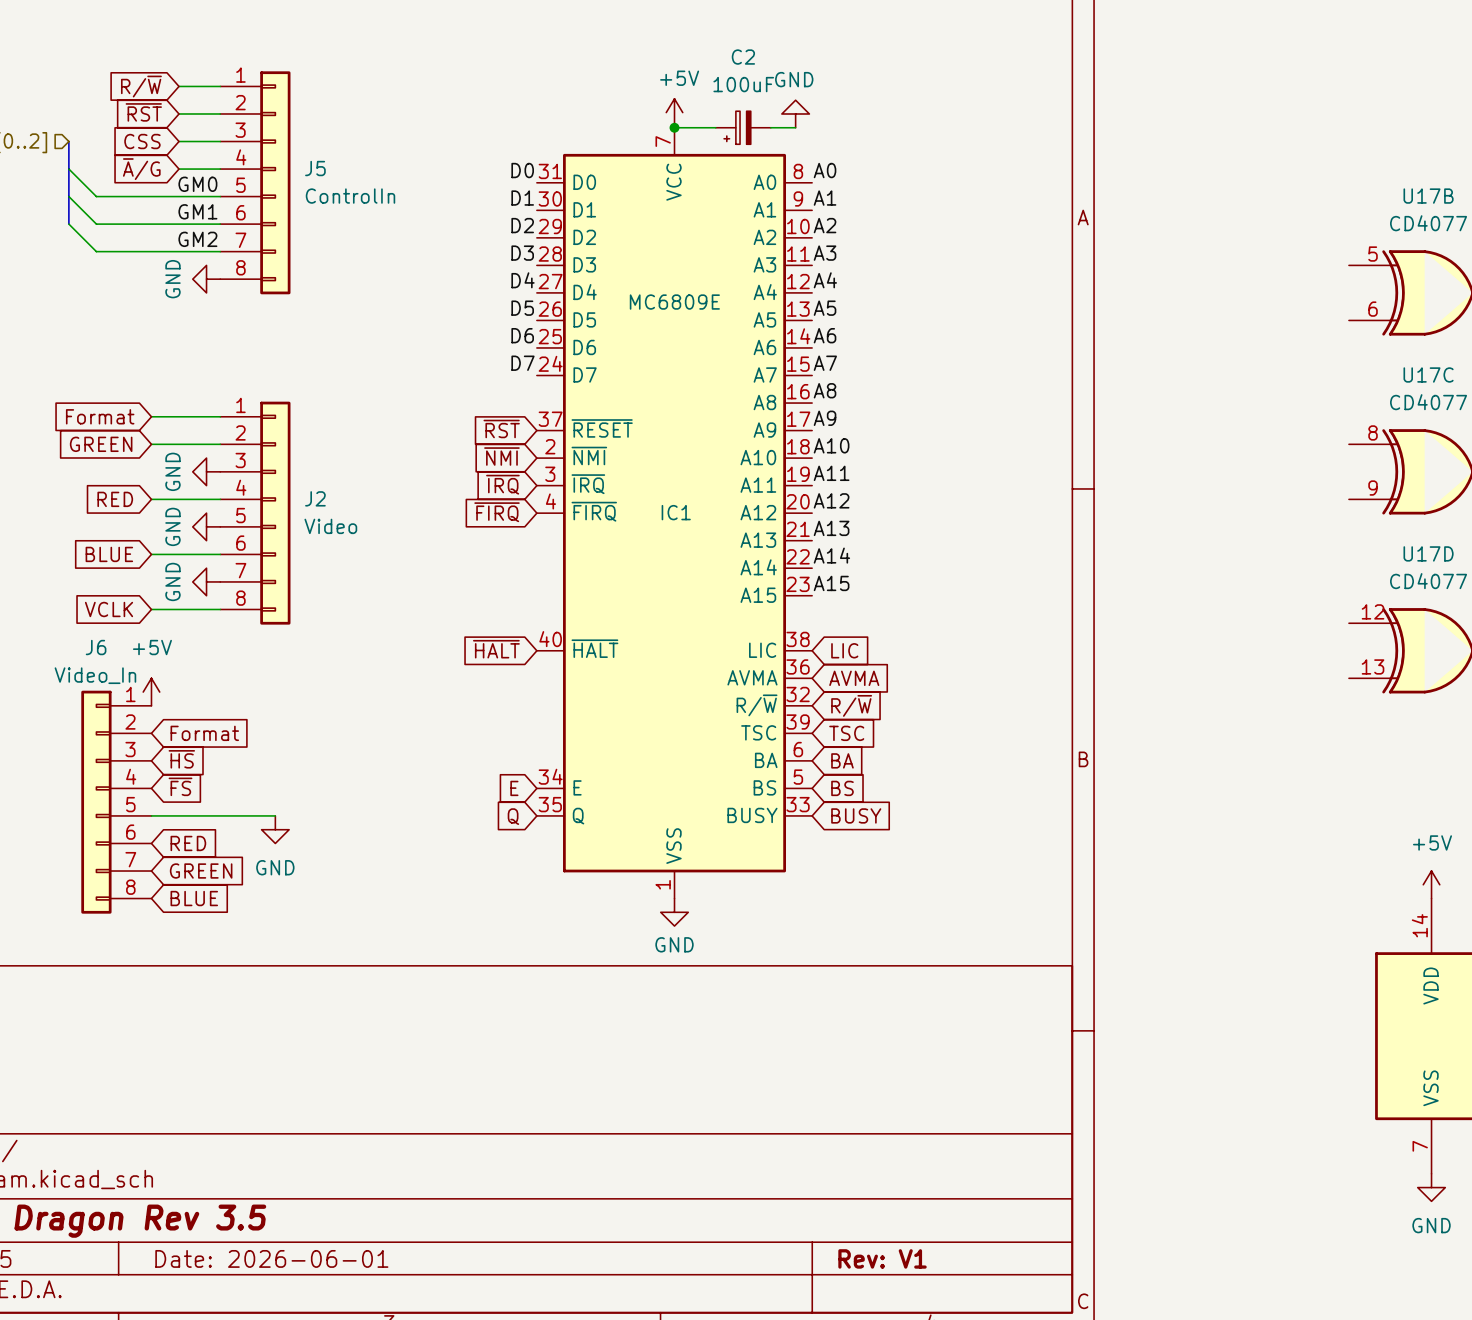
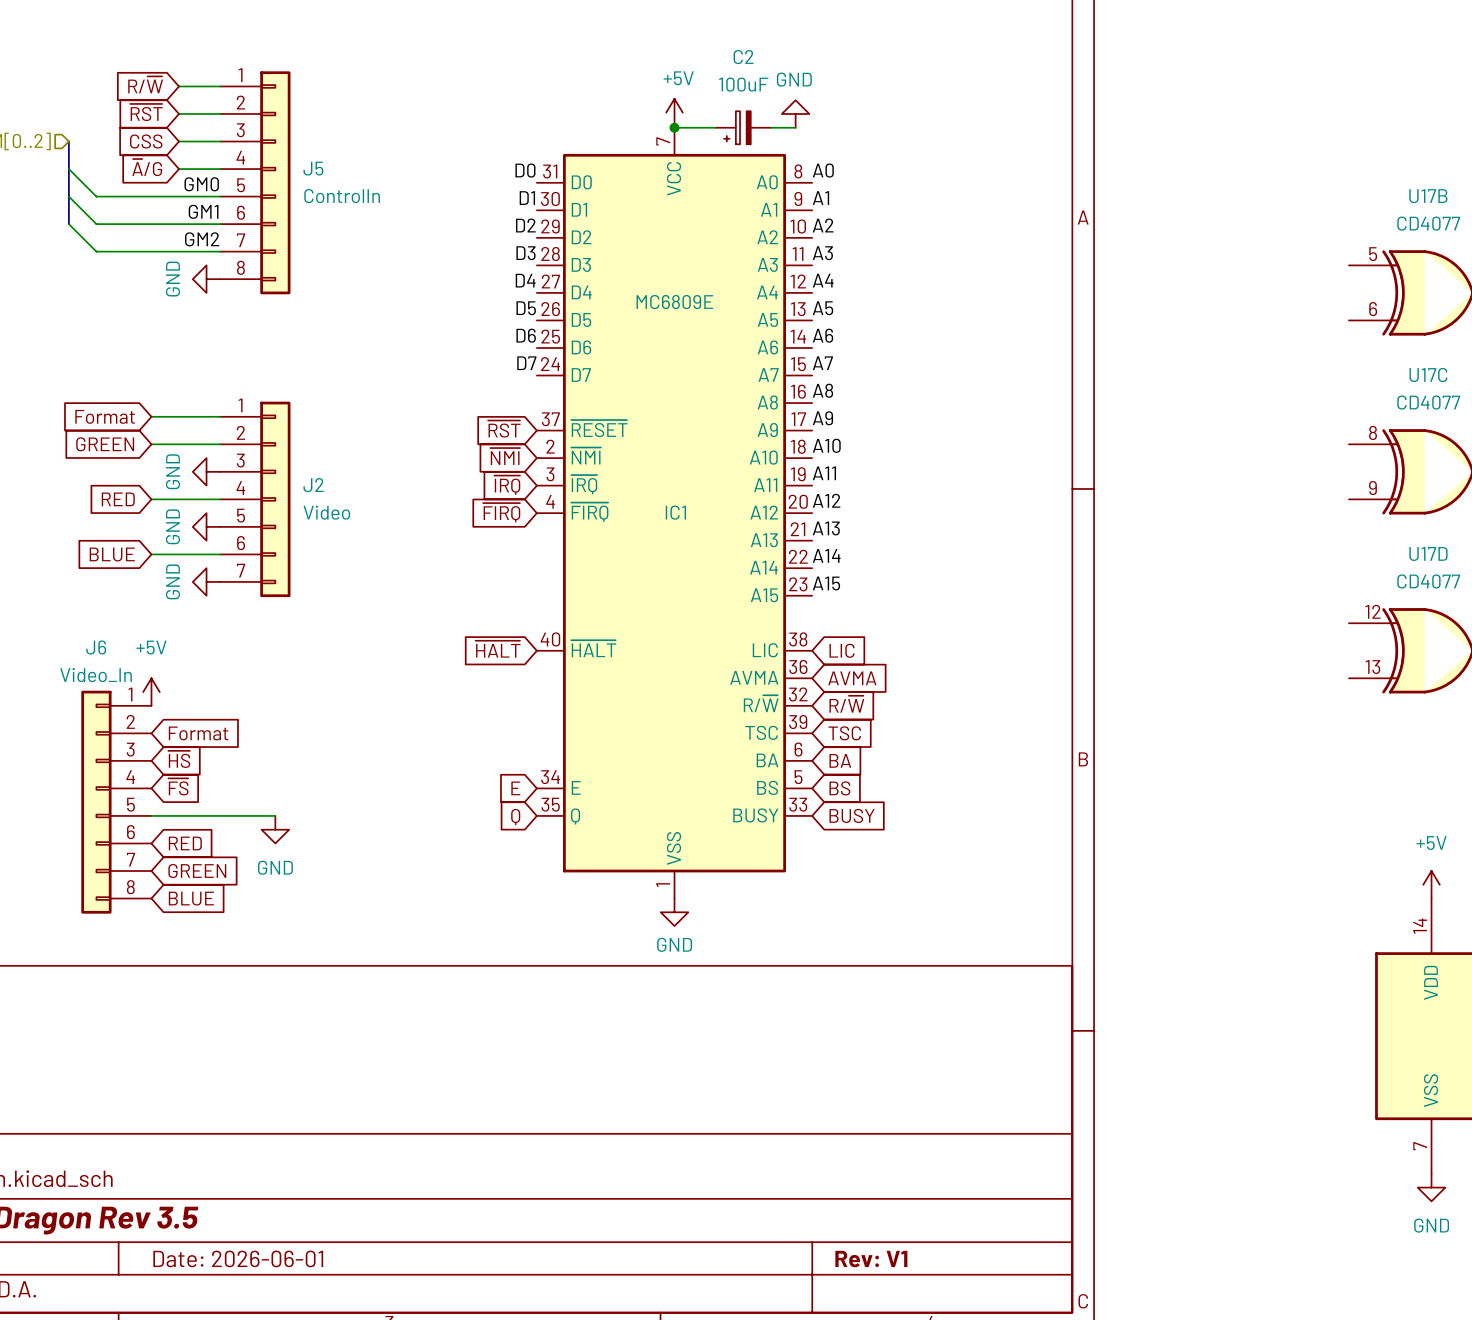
J2 symbol: [220, 401, 291, 625] -> [220, 401, 291, 598]
global label: VCLK (109, 609) -> none
wire: (151, 609) (220, 609) -> none

